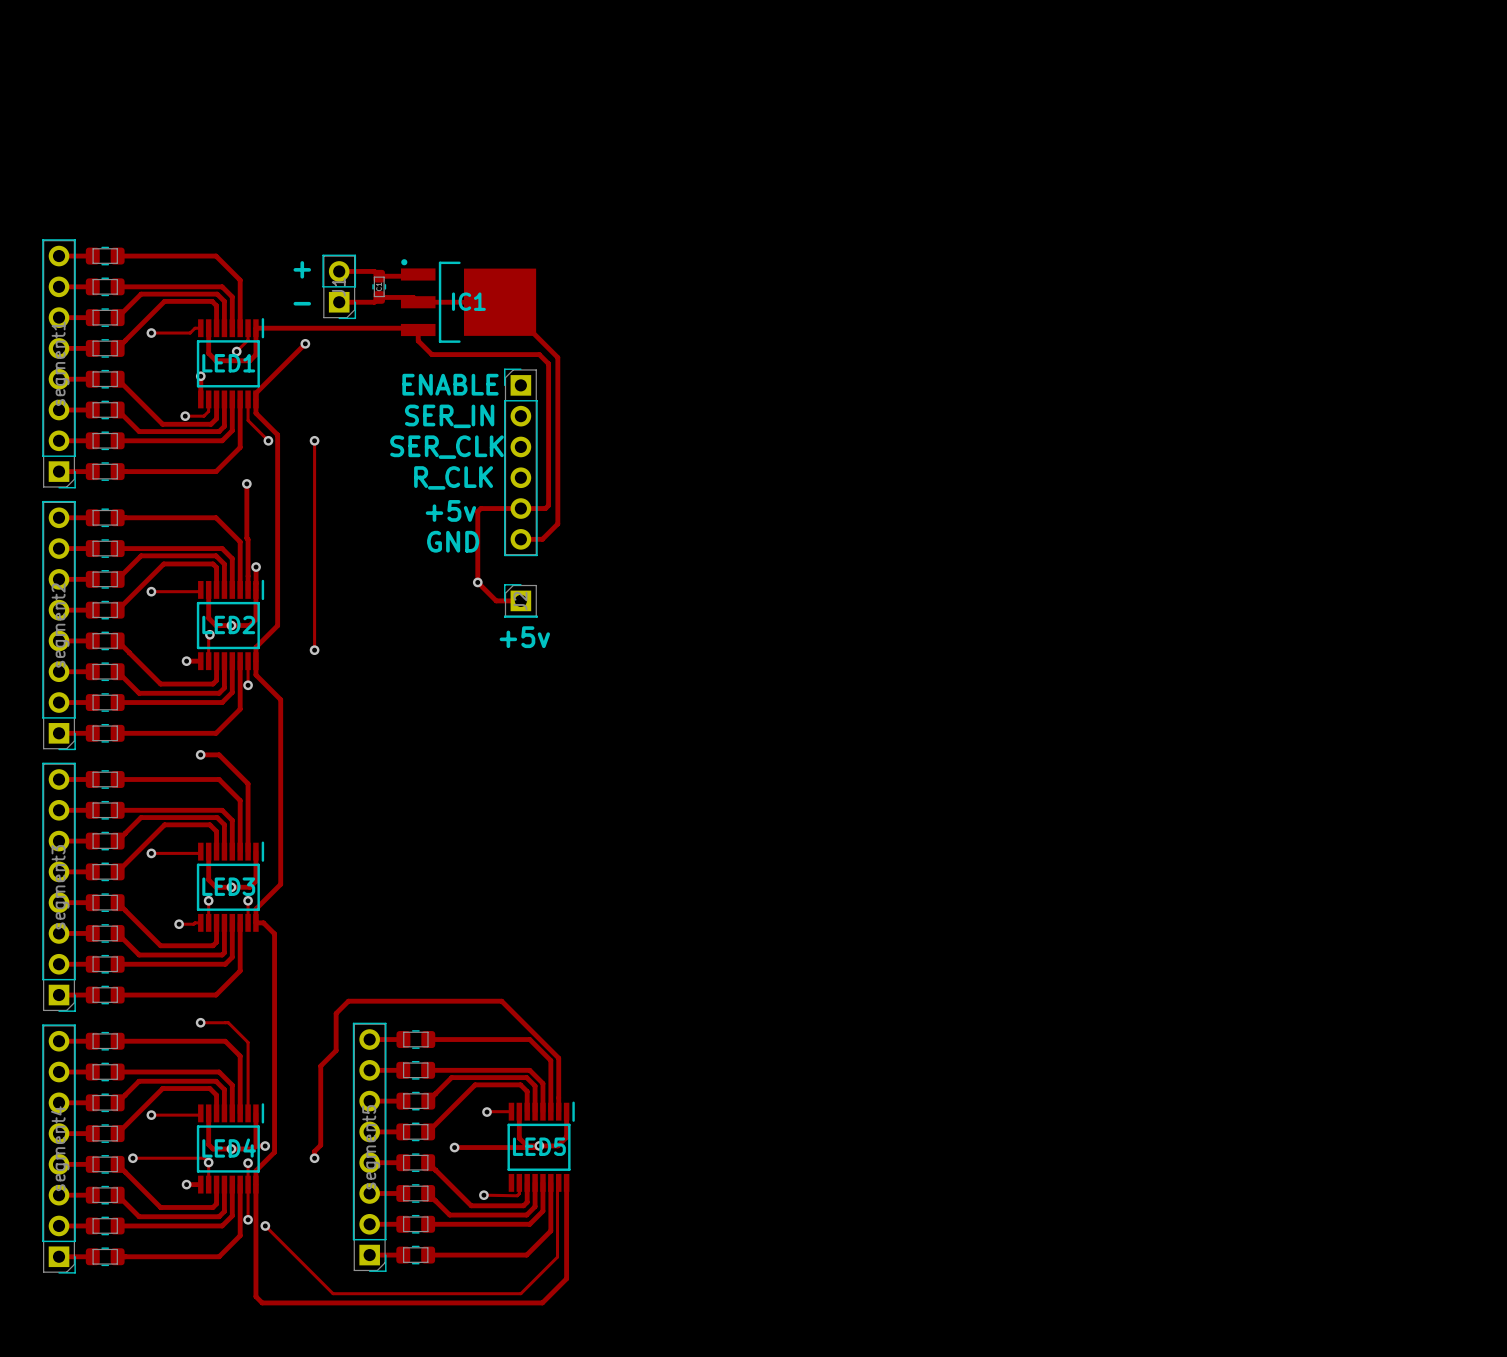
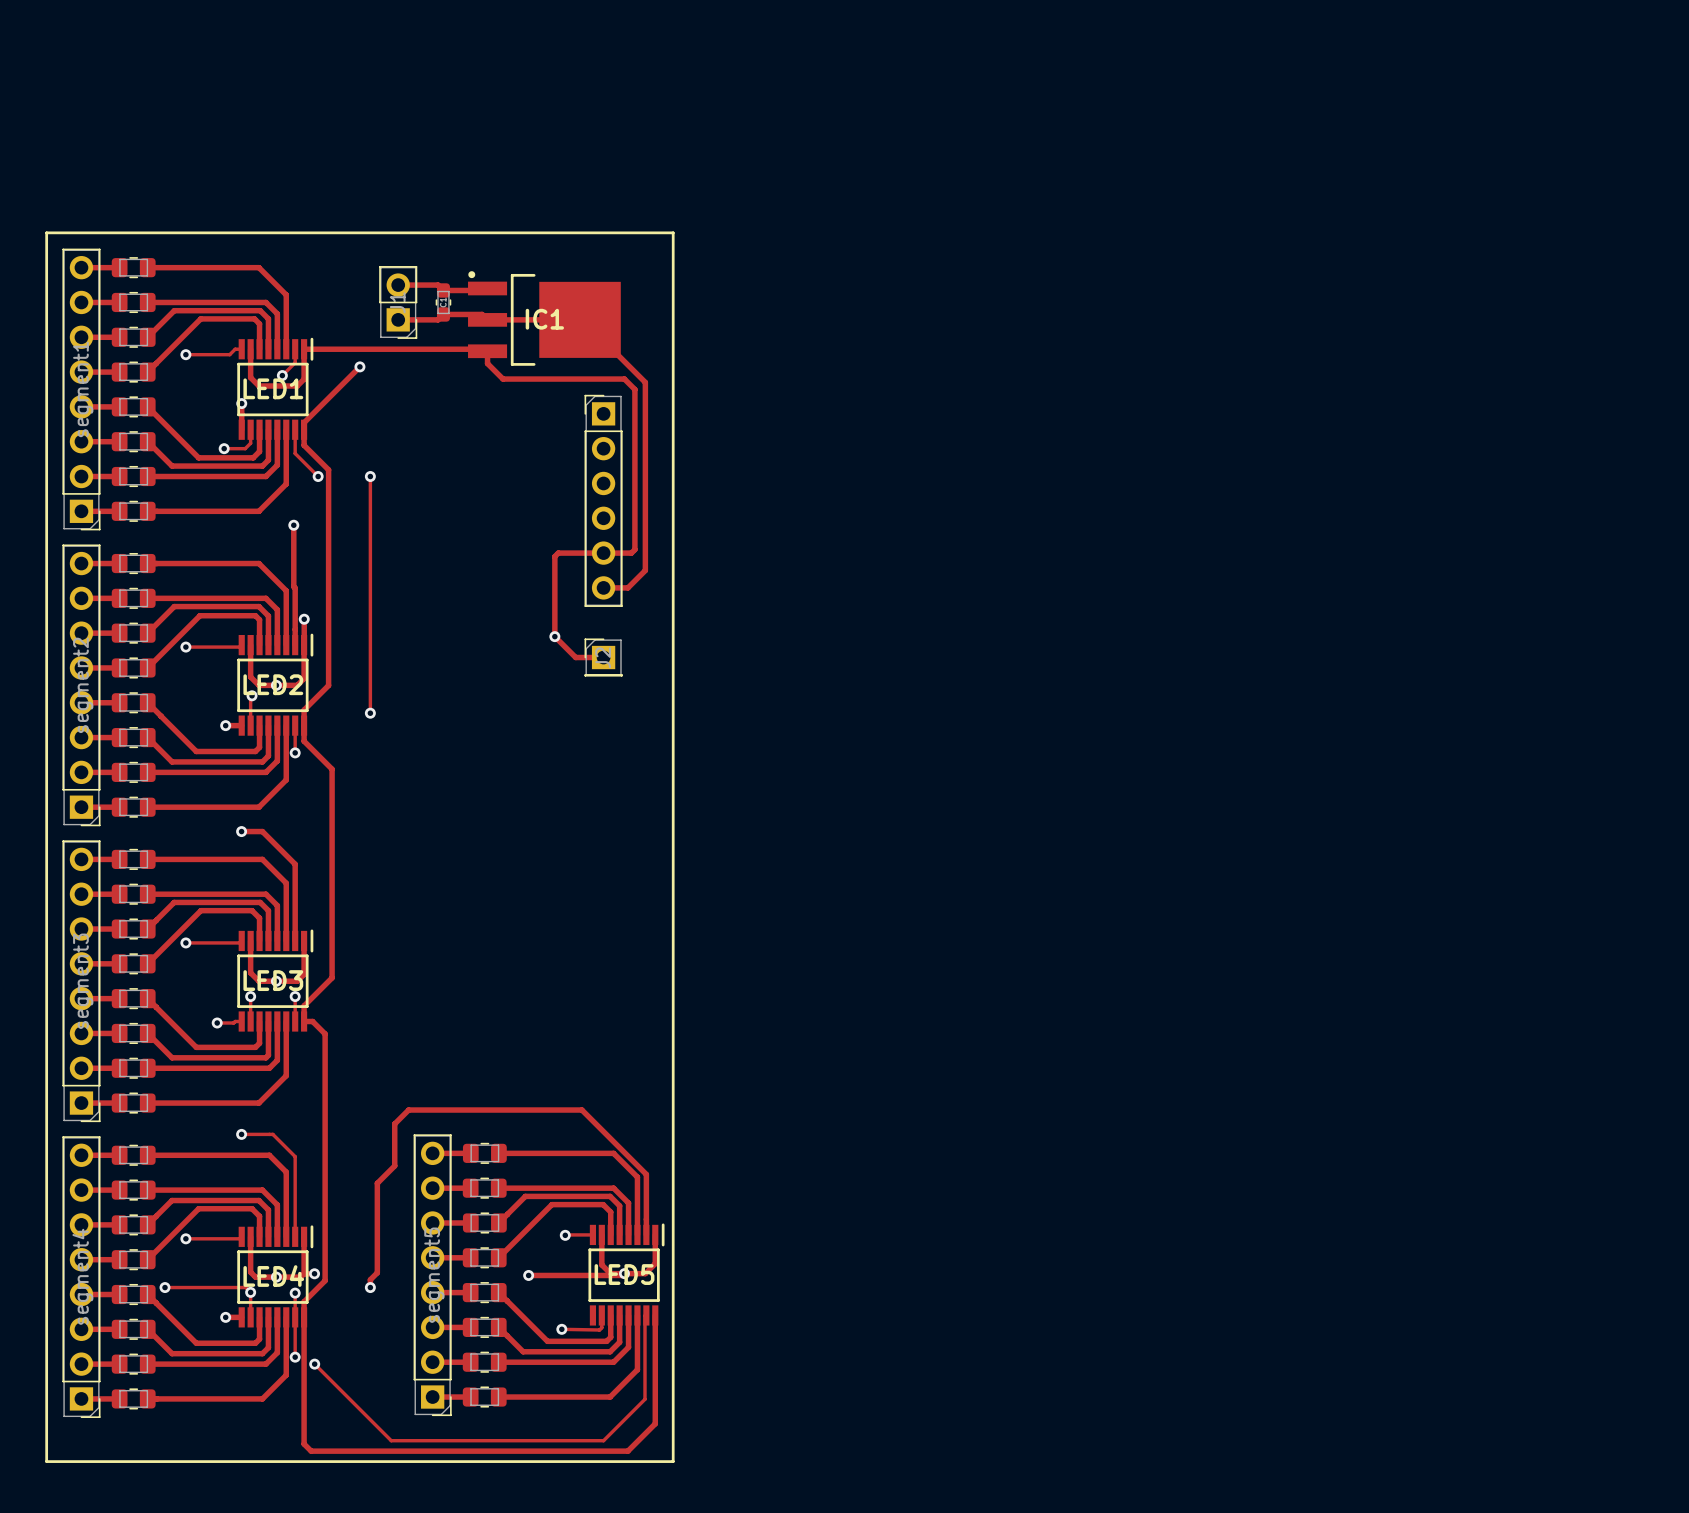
line: none -> (46, 232) (673, 232) (673, 1461) (46, 1461) (46, 232)
text: + (302, 269) -> none
text: - (302, 303) -> none
text: ENABLE (450, 384) -> none
text: SER_IN (449, 416) -> none
text: SER_CLK (446, 447) -> none
text: R_CLK (453, 477) -> none
text: +5v (450, 510) -> none
text: GND (453, 541) -> none
text: +5v (524, 637) -> none

